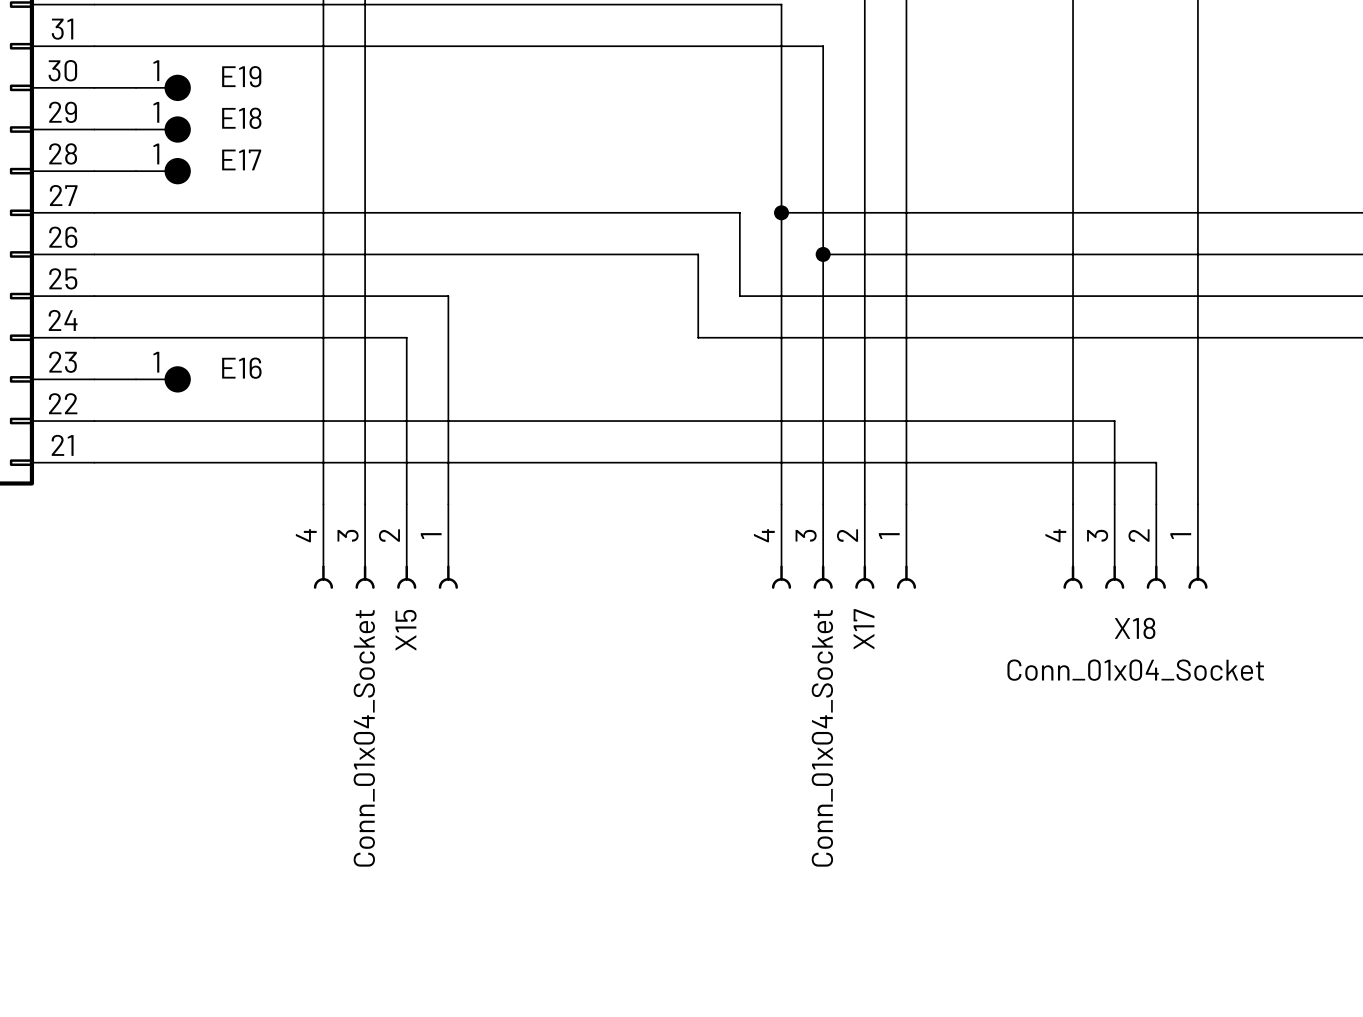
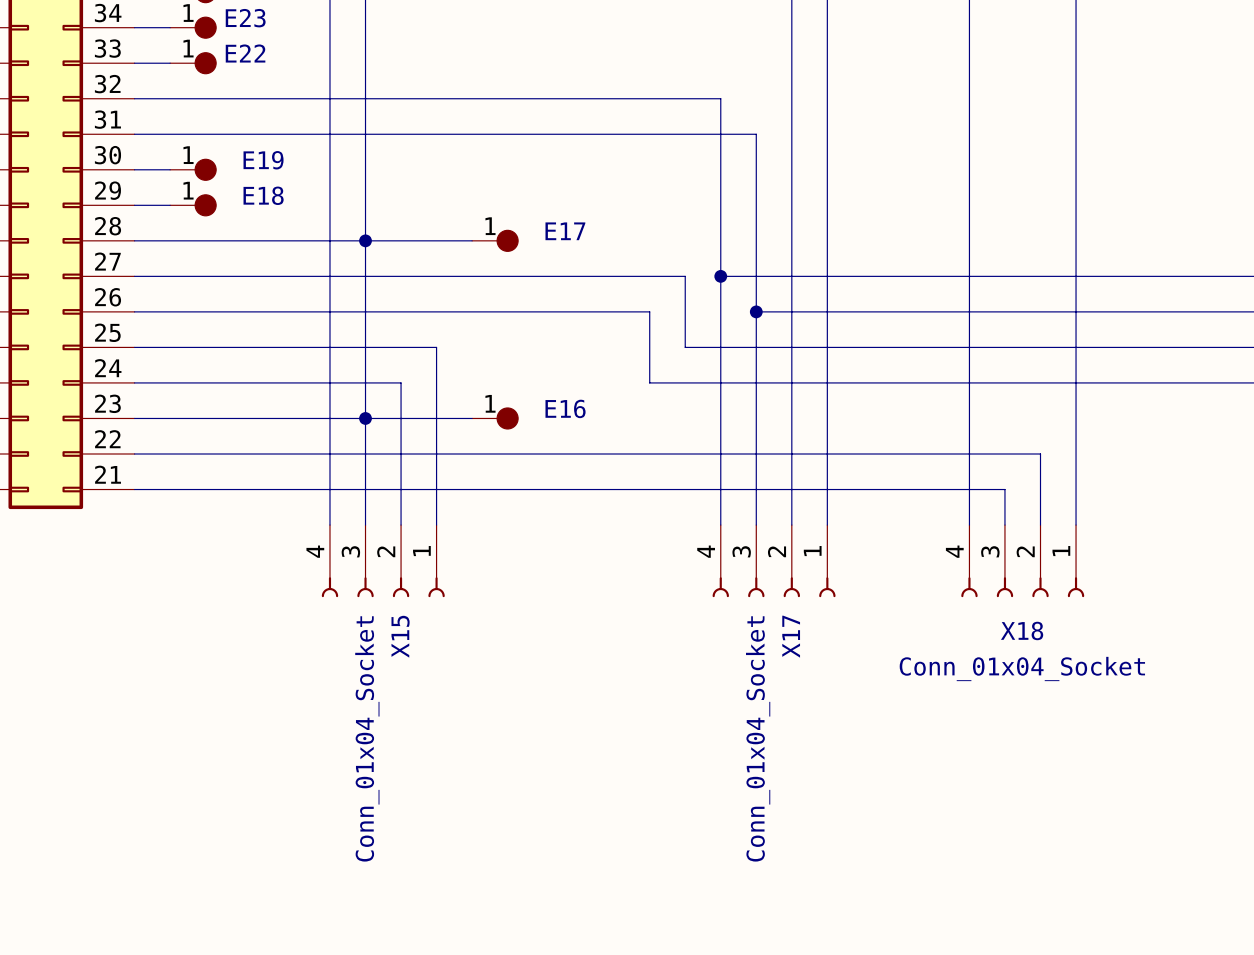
wire: none -> (170, 240) (472, 240)
E17 position: (163, 171) -> (495, 240)
junction: none -> (365, 240)
wire: none -> (170, 418) (472, 418)
E16 position: (163, 379) -> (495, 418)
junction: none -> (365, 418)
wire: (1114, 421) (1114, 462) (1156, 462) -> (1004, 454) (1040, 454) (1040, 489)

